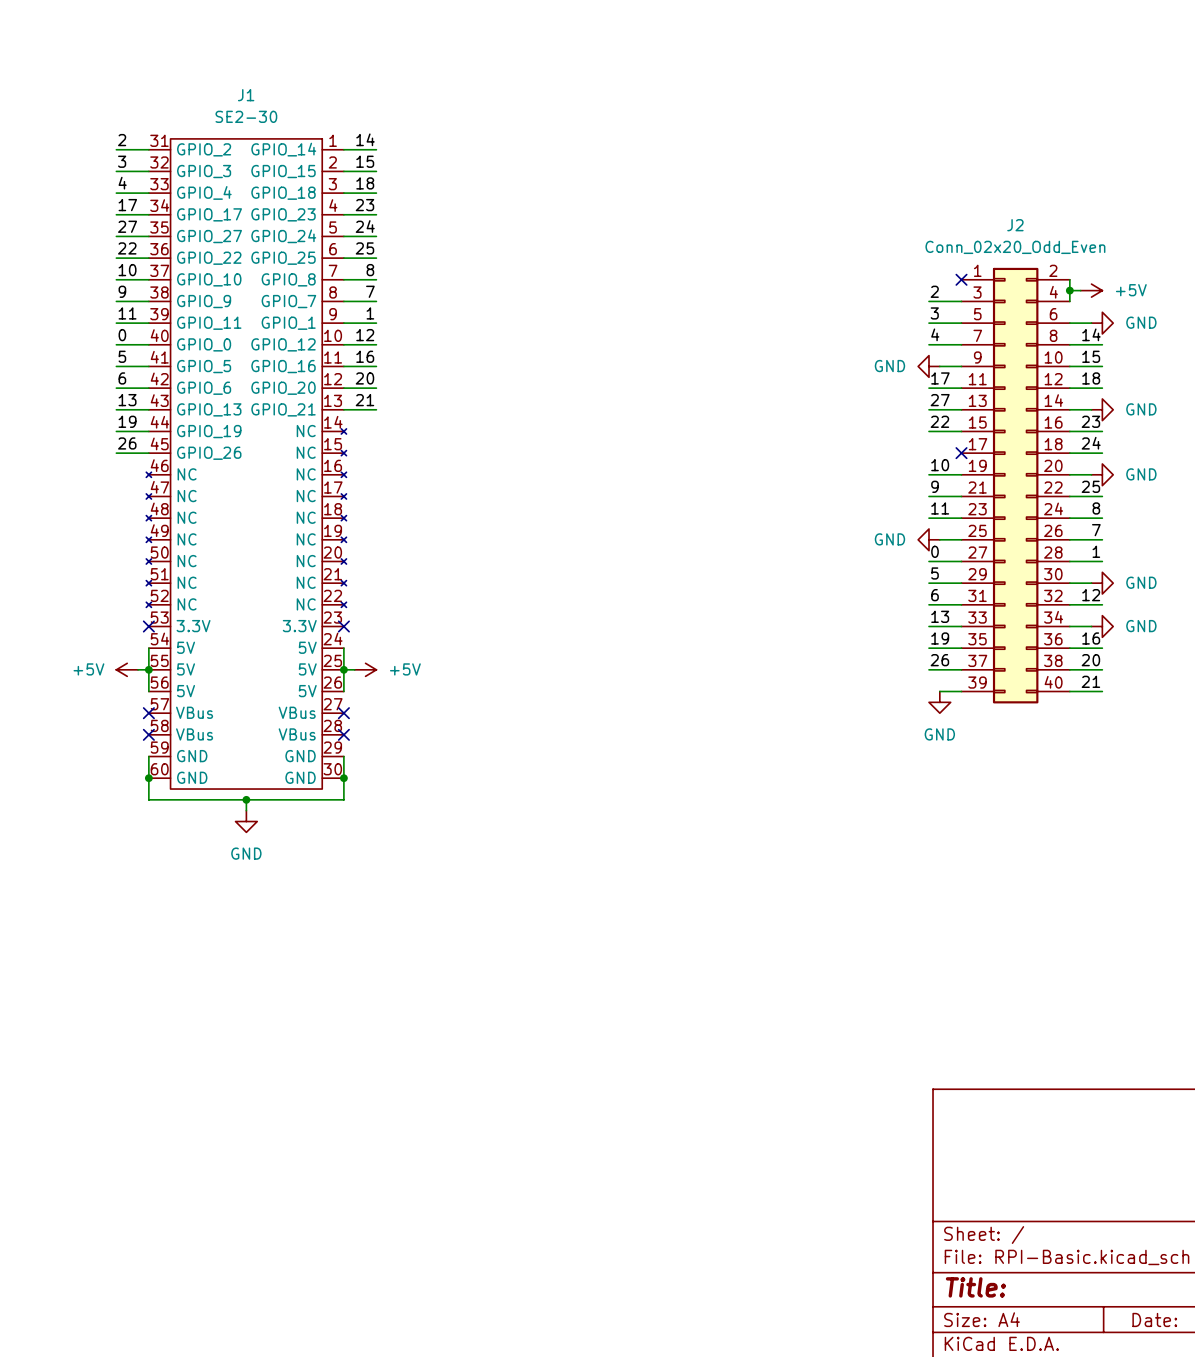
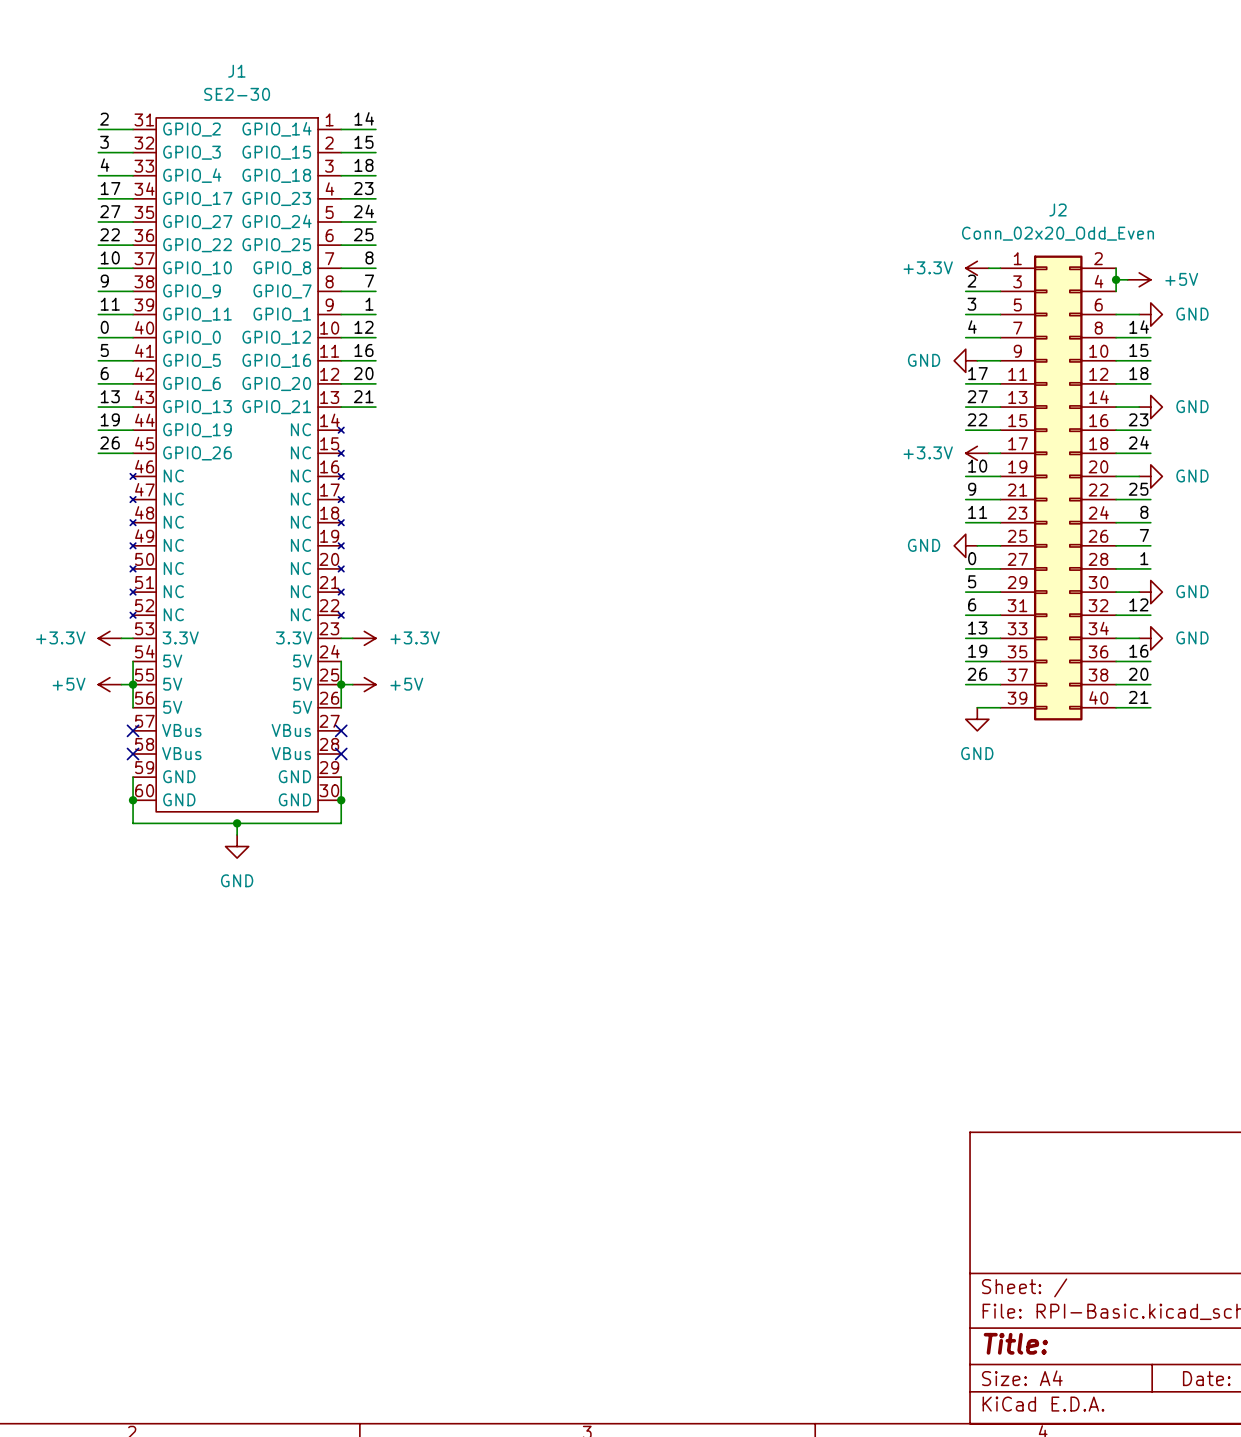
power symbol: none -> +3.3V (977, 268)
wire: none -> (988, 268) (1000, 268)
no-connect mark: (961, 279) -> none
power symbol: none -> +3.3V (977, 453)
wire: none -> (988, 453) (1000, 453)
no-connect mark: (961, 453) -> none
power symbol: none -> +3.3V (109, 638)
wire: none -> (121, 638) (133, 638)
no-connect mark: (148, 626) -> none
wire: none -> (341, 638) (352, 638)
no-connect mark: (343, 626) -> none
power symbol: none -> +3.3V (364, 638)

